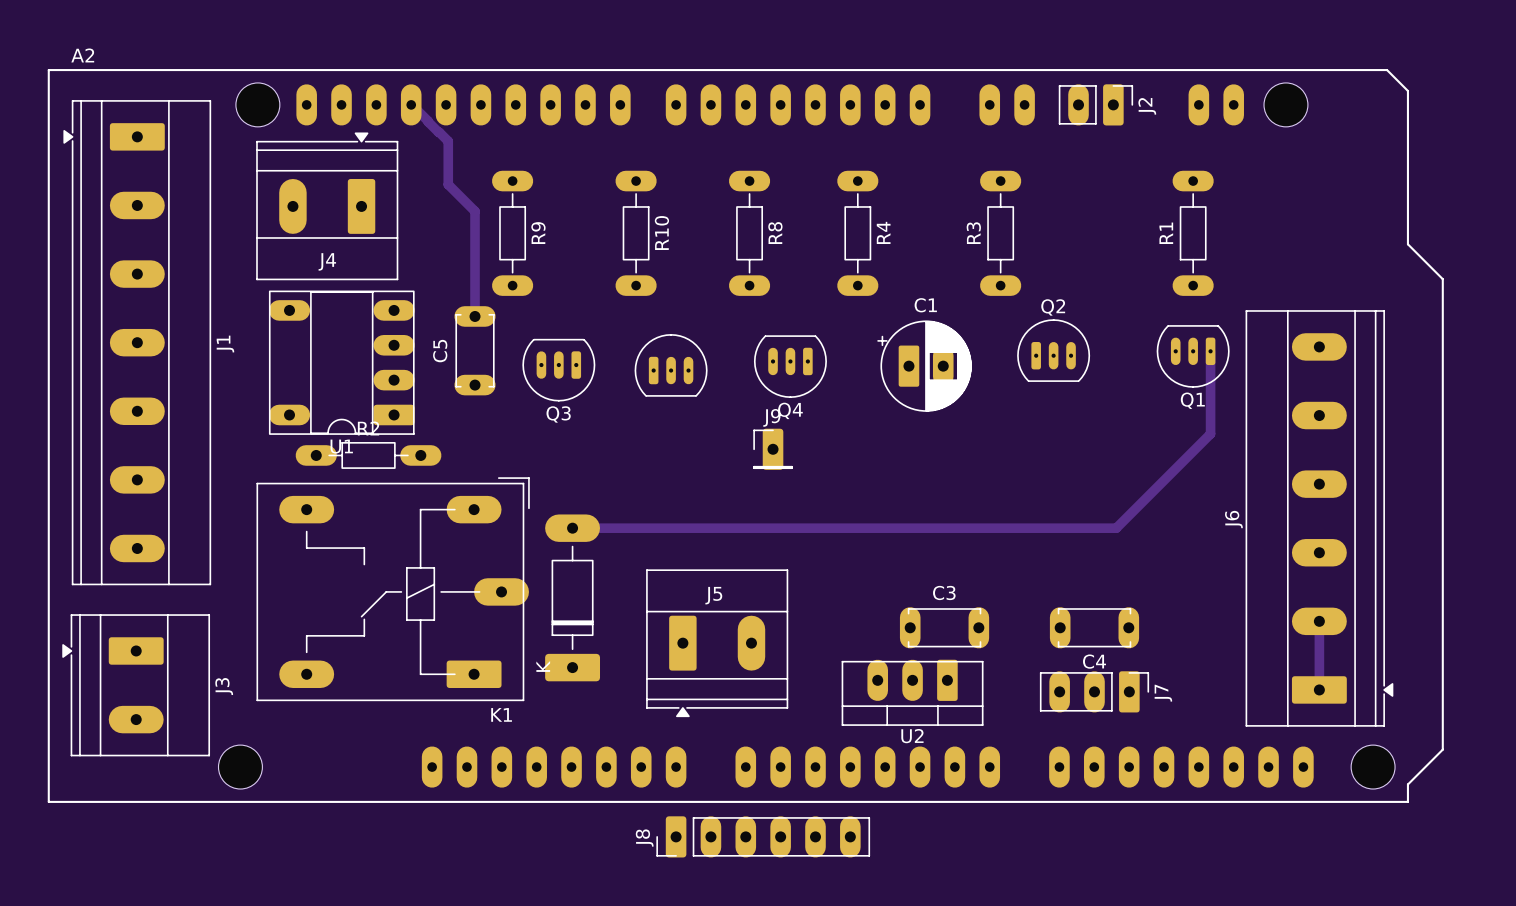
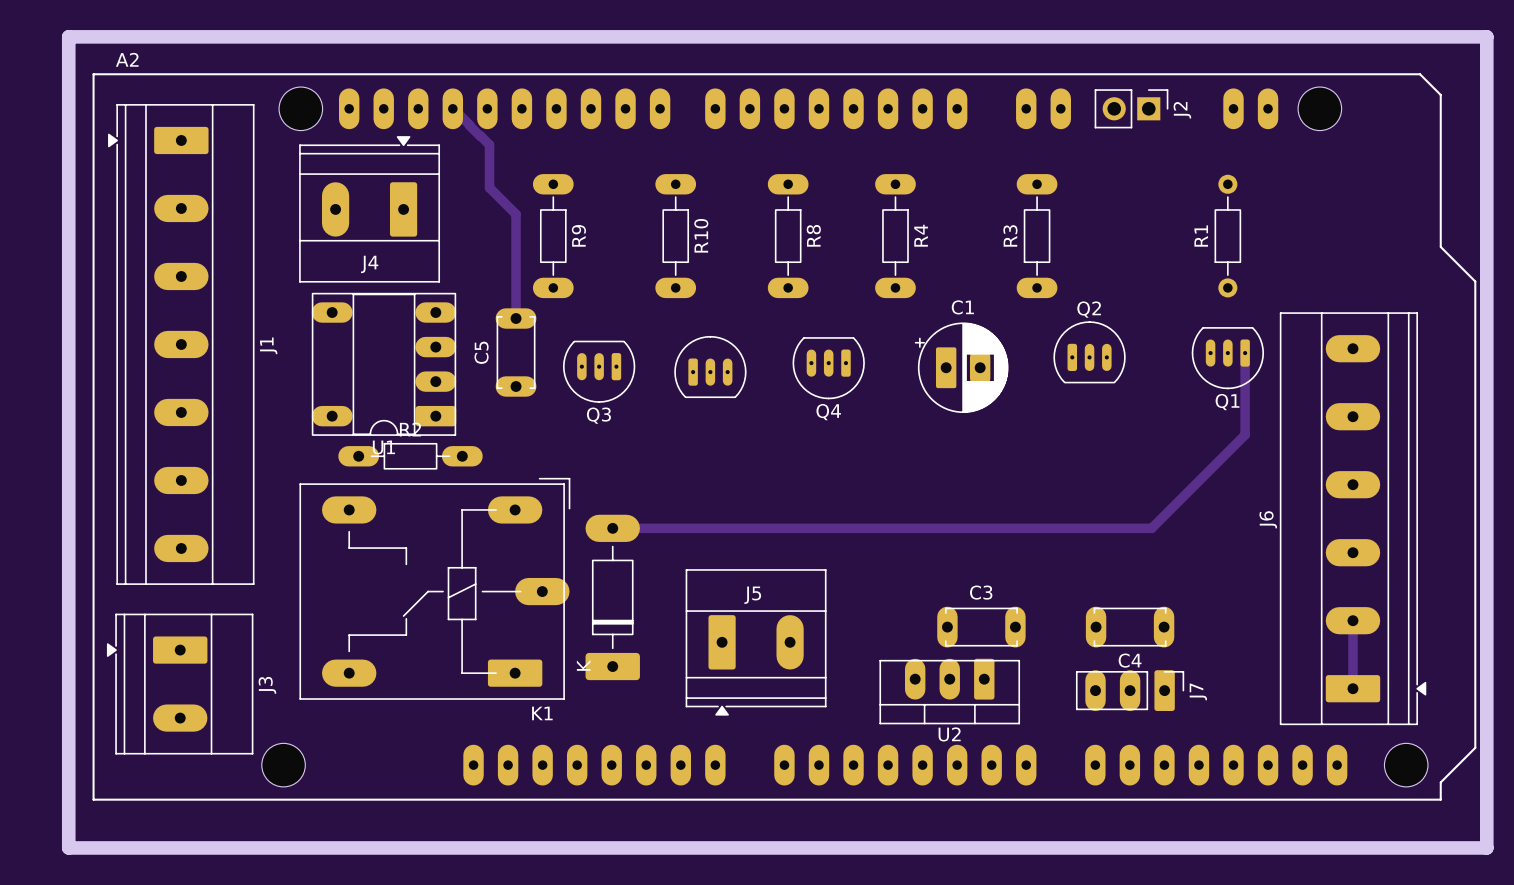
board edge: none -> (68, 36) (1486, 36) (1486, 847) (68, 847) (68, 36)
J2 footprint: [1058, 84, 1134, 126] -> [1094, 89, 1169, 129]
R1 footprint: [1172, 170, 1214, 296] -> [1214, 174, 1242, 298]
J9: (773, 449) -> none
J8: (763, 836) -> none

